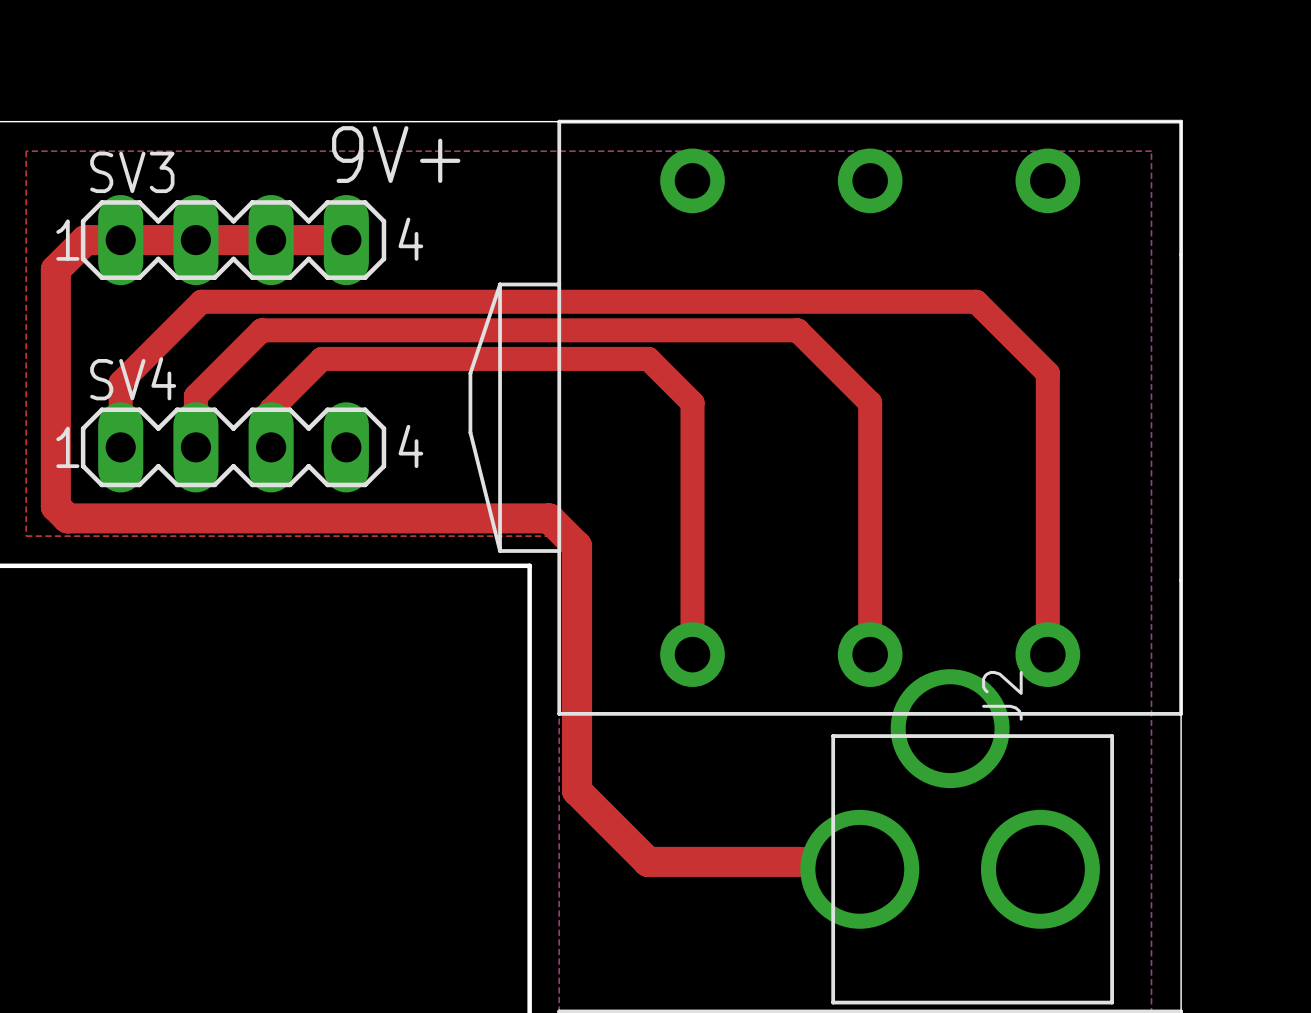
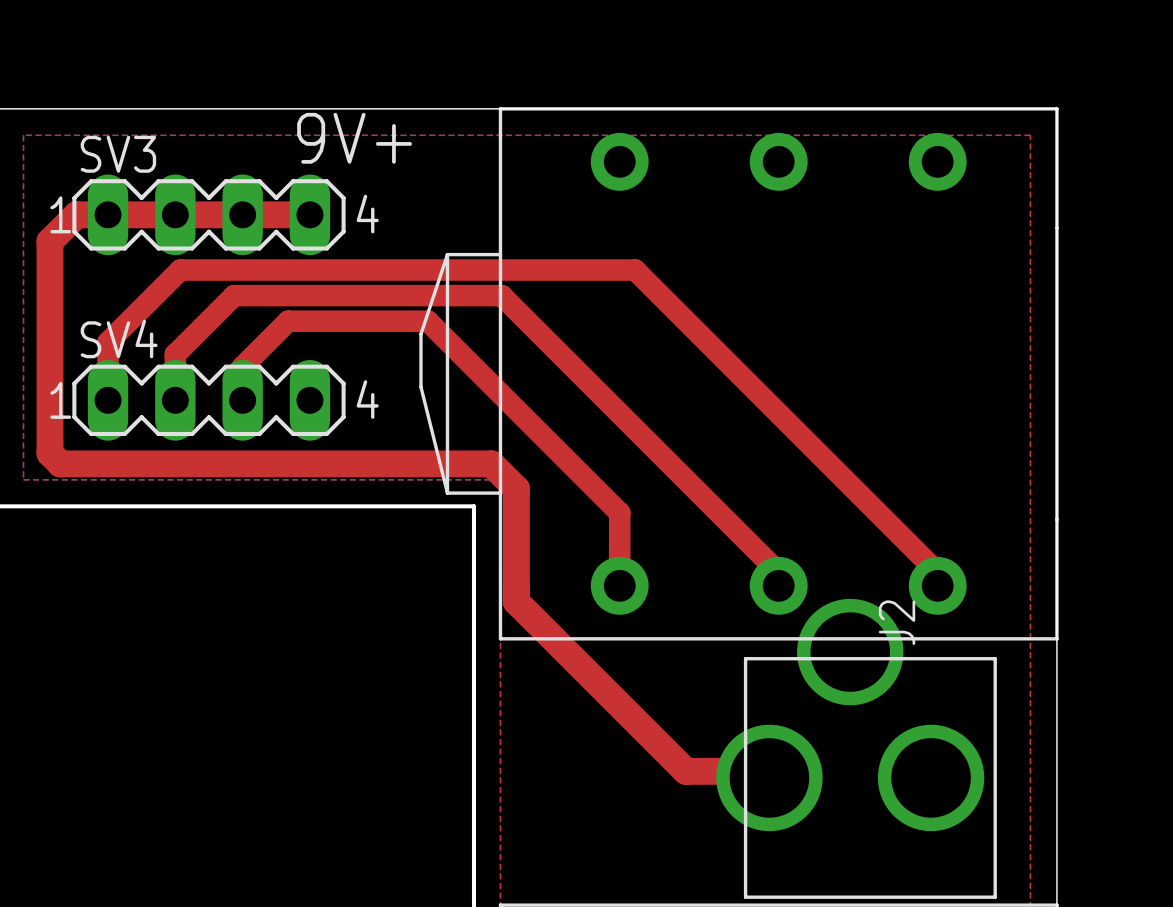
top track: (709, 301) (976, 301) (1047, 373) (1047, 639) -> (635, 270) (937, 572)
top track: (560, 330) (797, 330) (870, 402) (870, 639) -> (501, 295) (778, 572)
top track: (478, 358) (648, 358) (692, 402) (692, 573) -> (427, 321) (619, 512)
top track: (577, 672) (577, 790) (648, 861) (766, 861) -> (516, 601) (685, 771)

